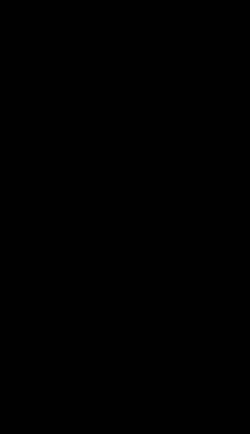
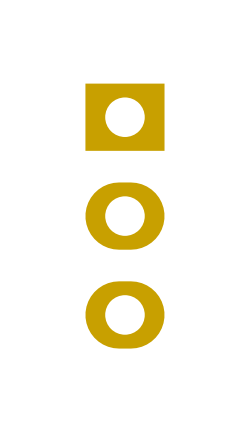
part: none -> (124, 216)

